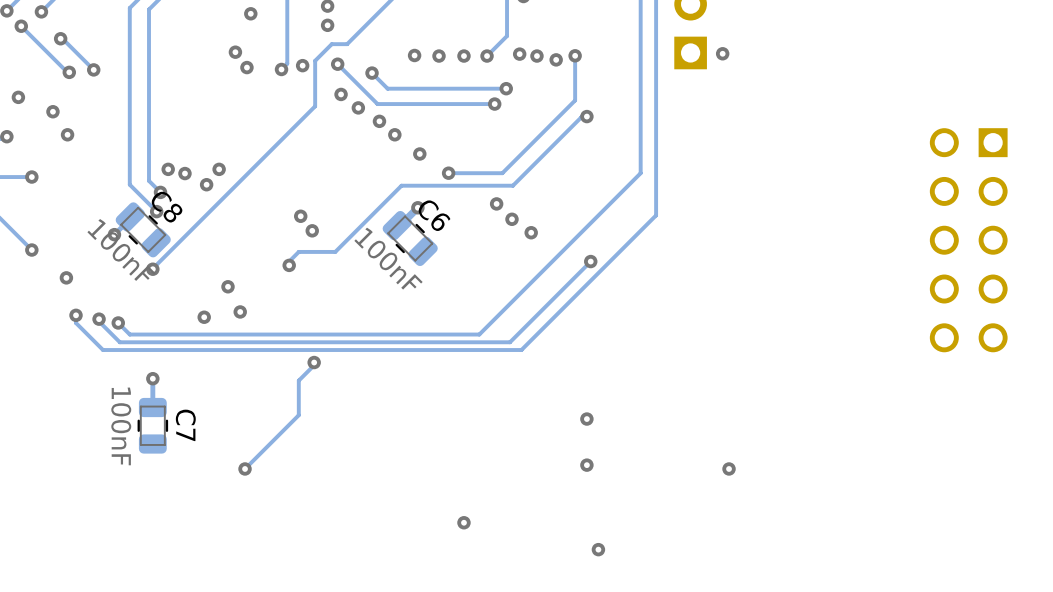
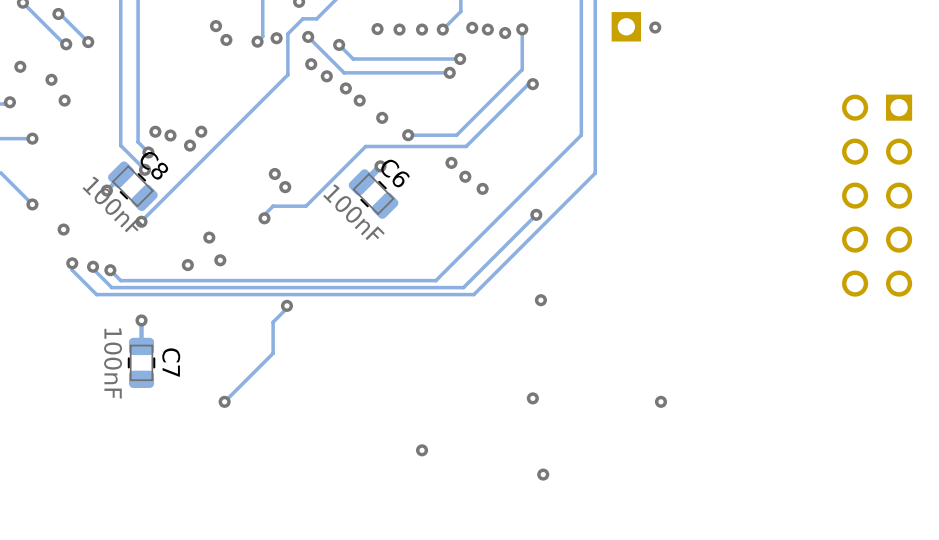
via position: (586, 419) -> (540, 300)

